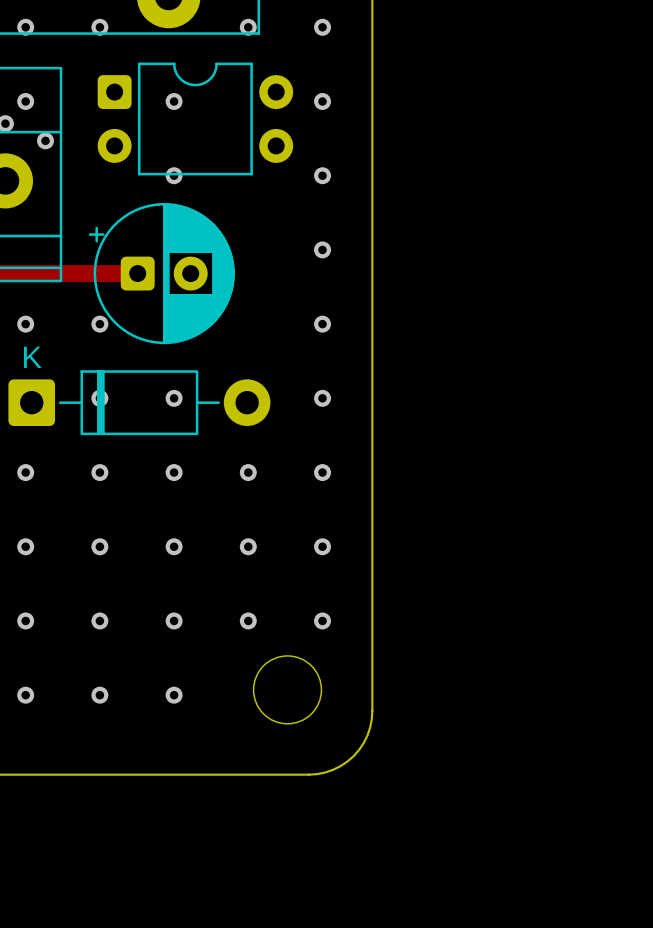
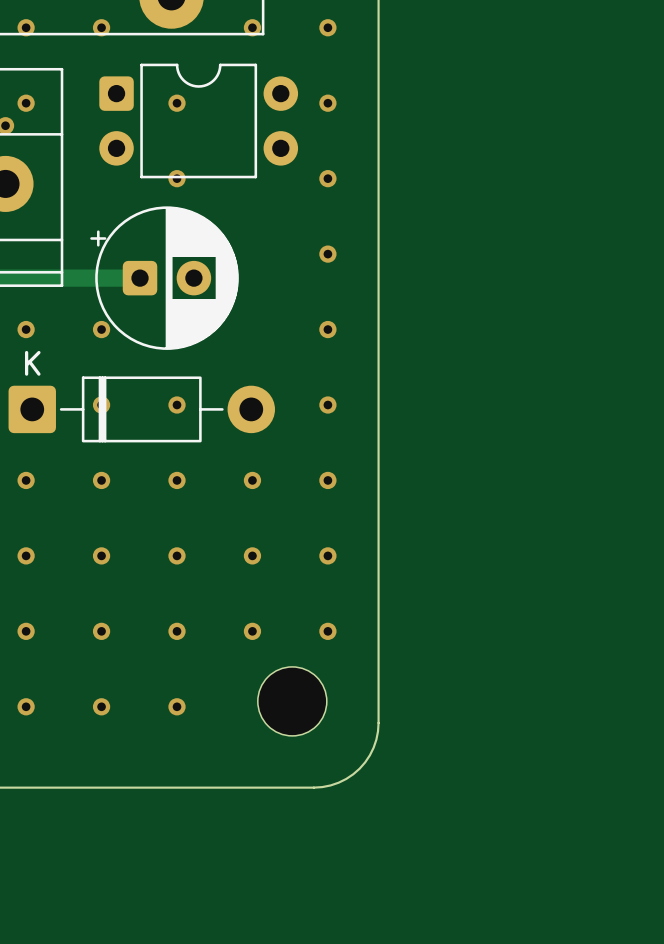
via: (45, 140) -> none

